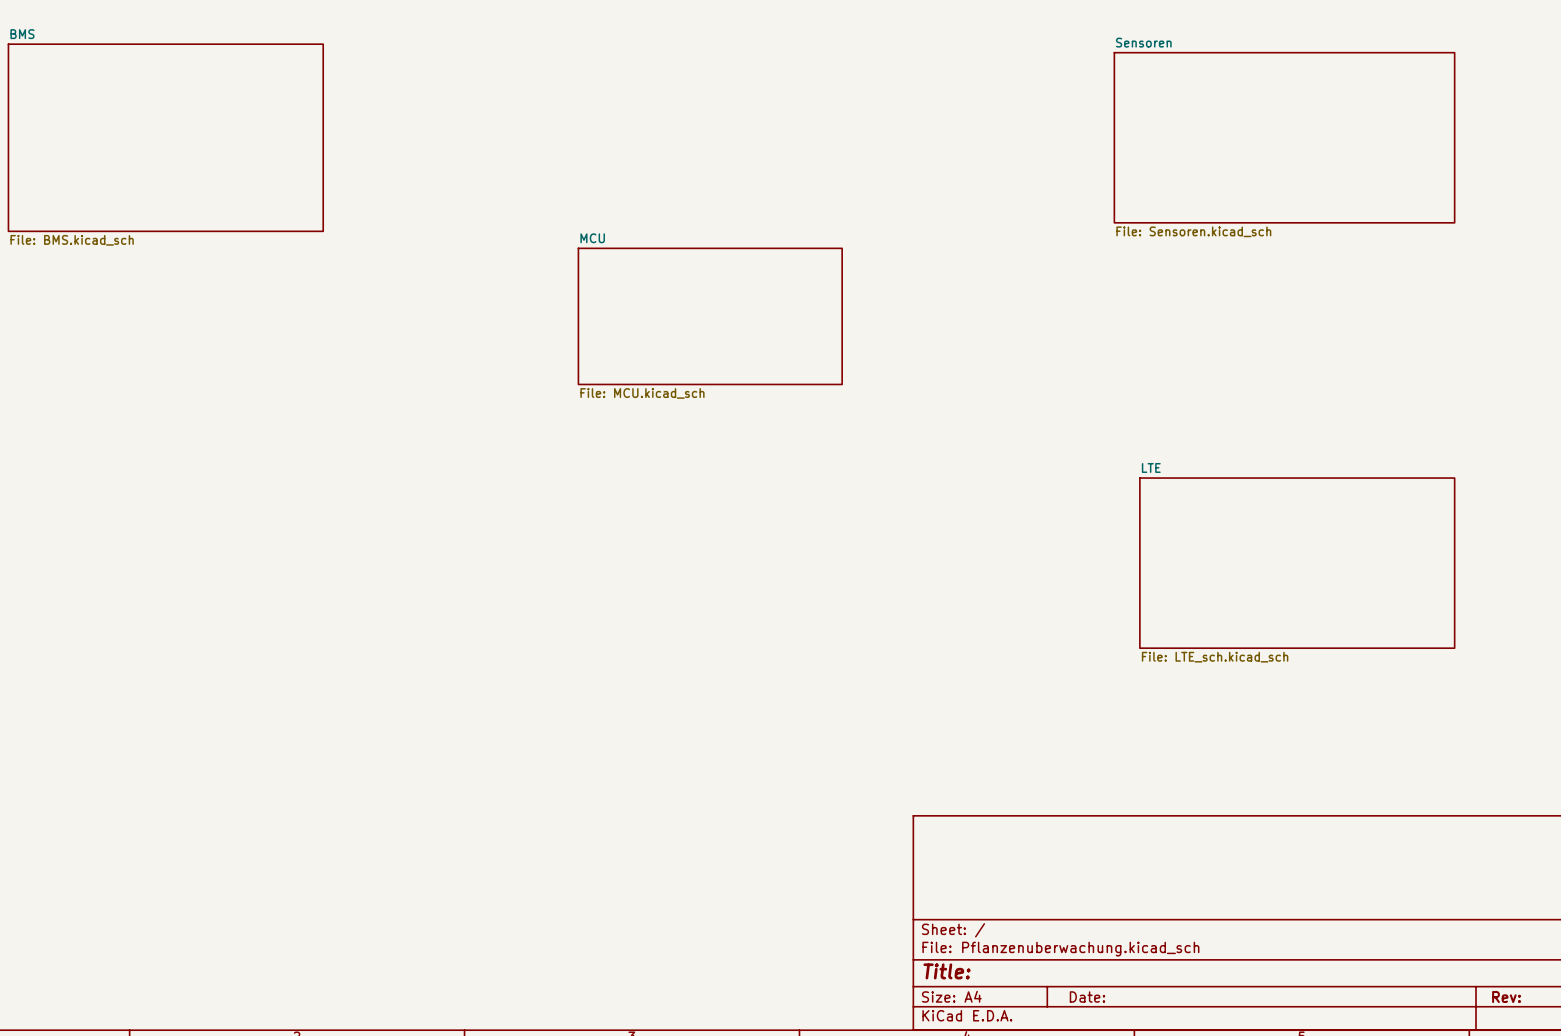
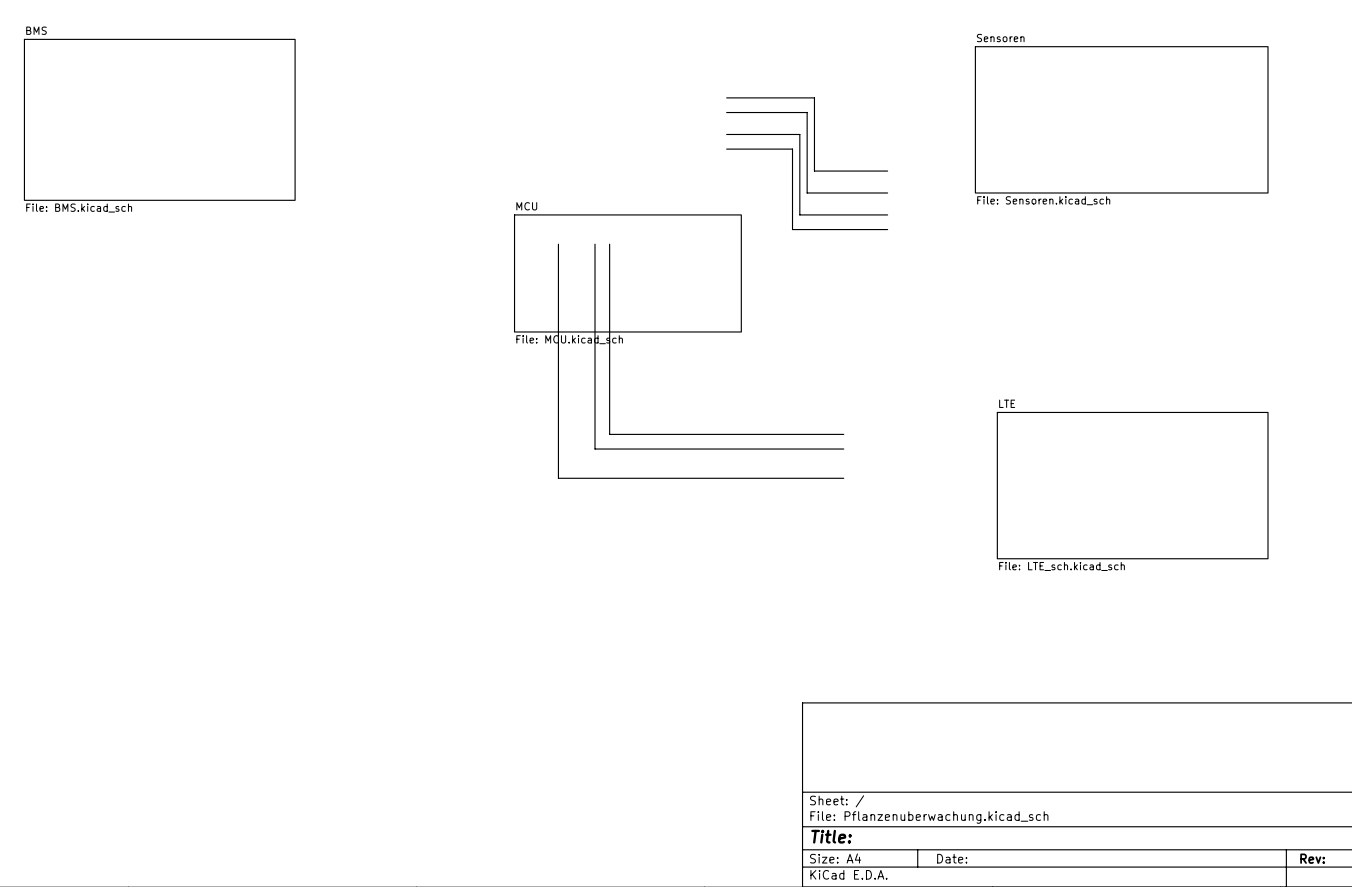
wire: none -> (726, 97) (814, 97) (814, 171) (887, 171)
wire: none -> (726, 112) (807, 112) (807, 192) (887, 192)
wire: none -> (726, 134) (799, 134) (799, 214) (887, 214)
wire: none -> (726, 149) (792, 149) (792, 229) (887, 229)
wire: none -> (558, 244) (558, 478) (843, 478)
wire: none -> (595, 244) (595, 449) (843, 449)
wire: none -> (609, 244) (609, 434) (843, 434)

